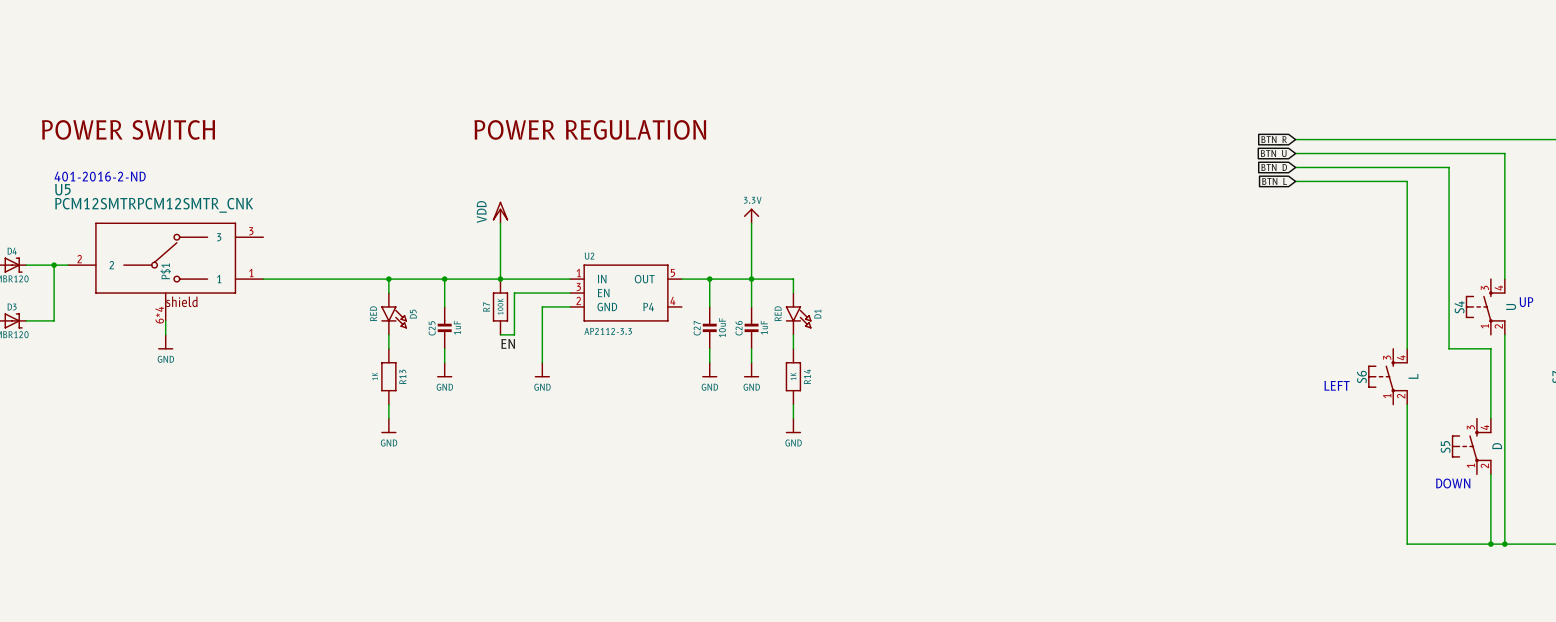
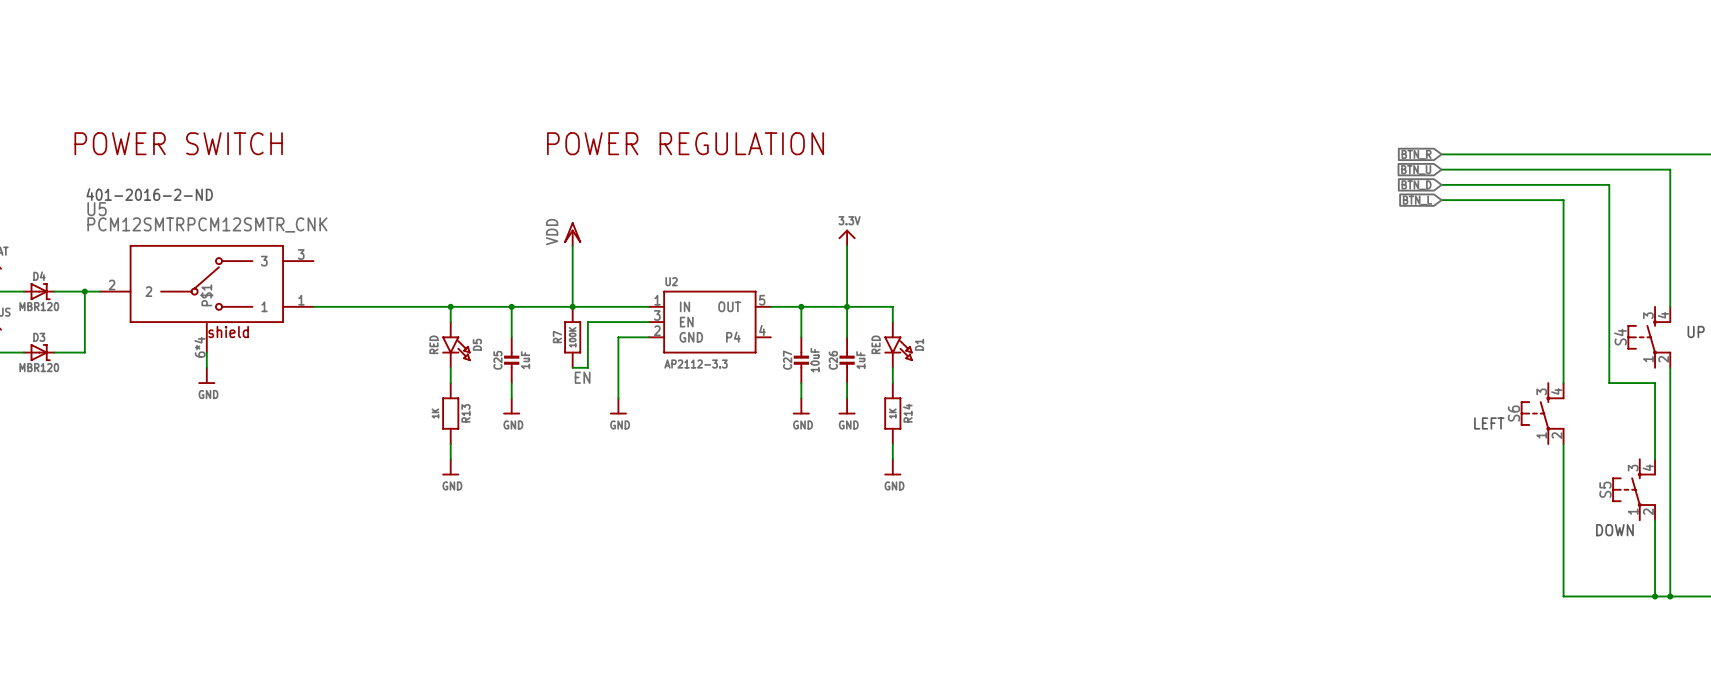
S4 value: U (1511, 307) -> none
S6 value: L (1413, 376) -> none
S5 value: D (1497, 446) -> none

